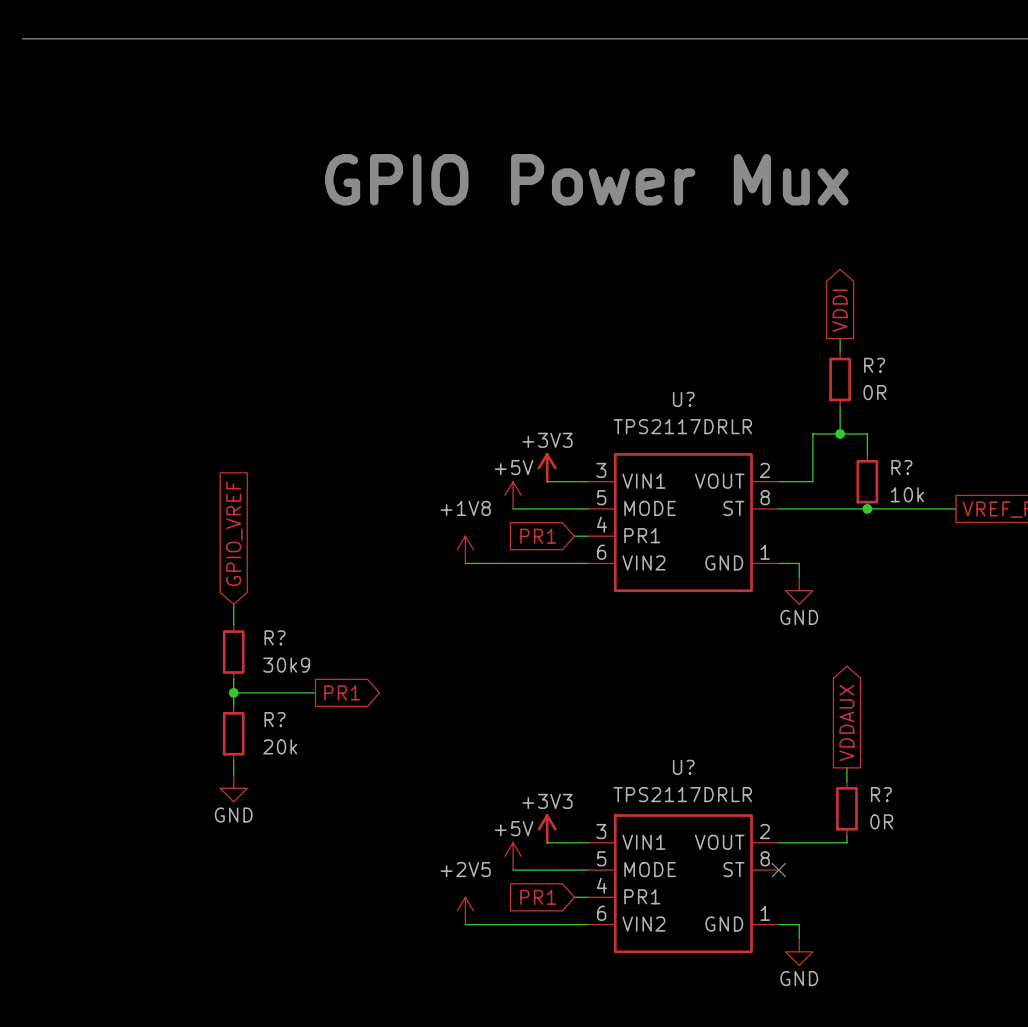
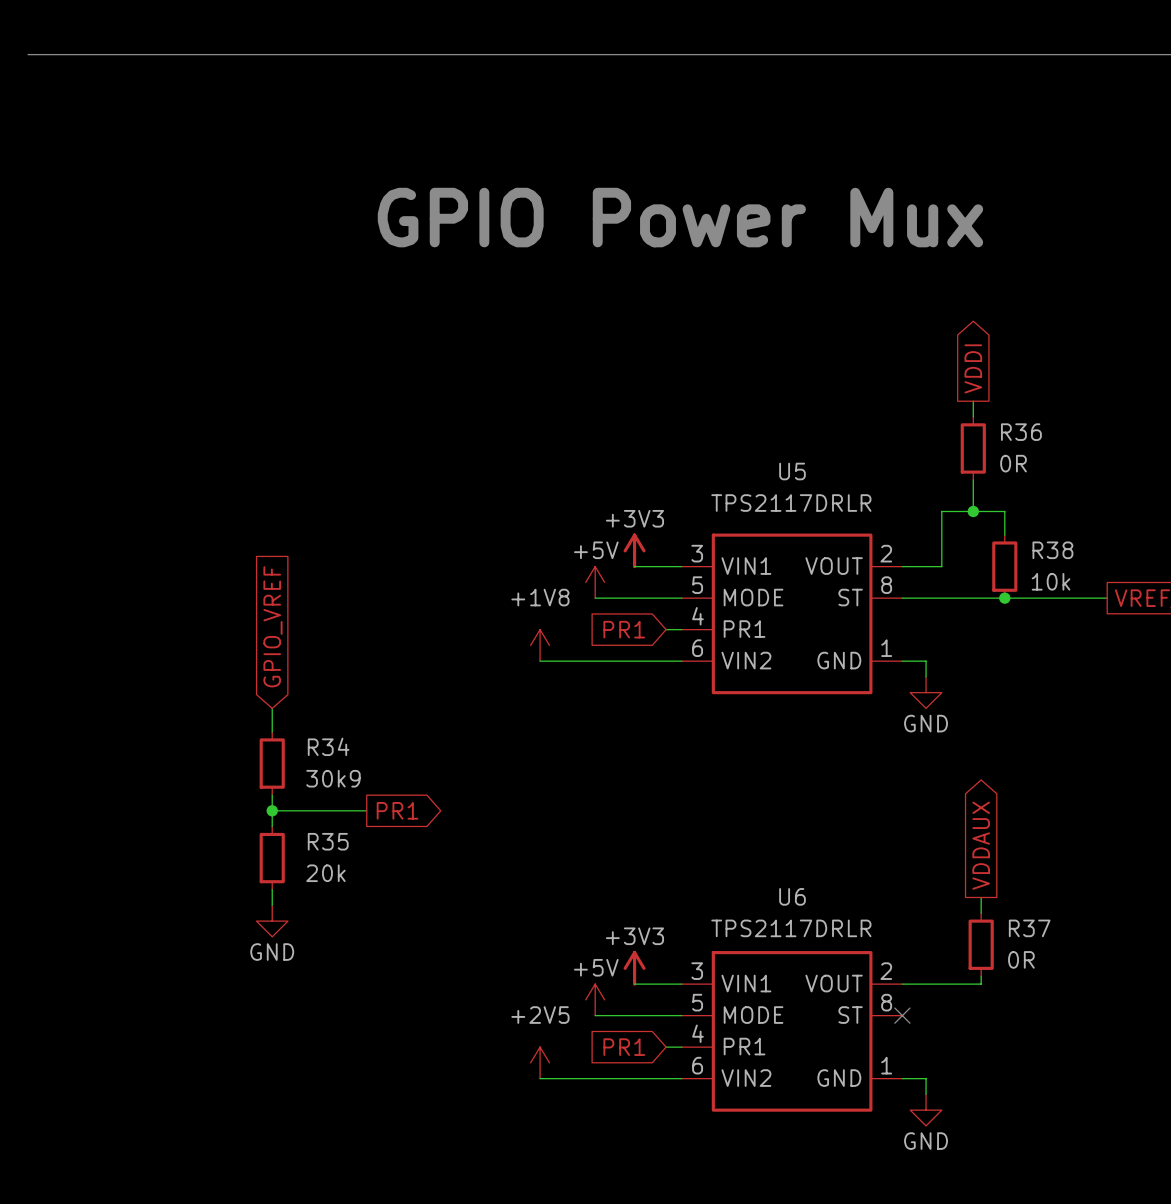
R? name: R? (874, 365) -> R36 (1021, 432)
U? name: U? (683, 399) -> U5 (792, 471)
R? name: R? (901, 467) -> R38 (1052, 550)
R? name: R? (275, 637) -> R34 (328, 746)
R? name: R? (275, 719) -> R35 (328, 841)
U? name: U? (683, 767) -> U6 (792, 896)
R? name: R? (881, 794) -> R37 (1029, 928)

